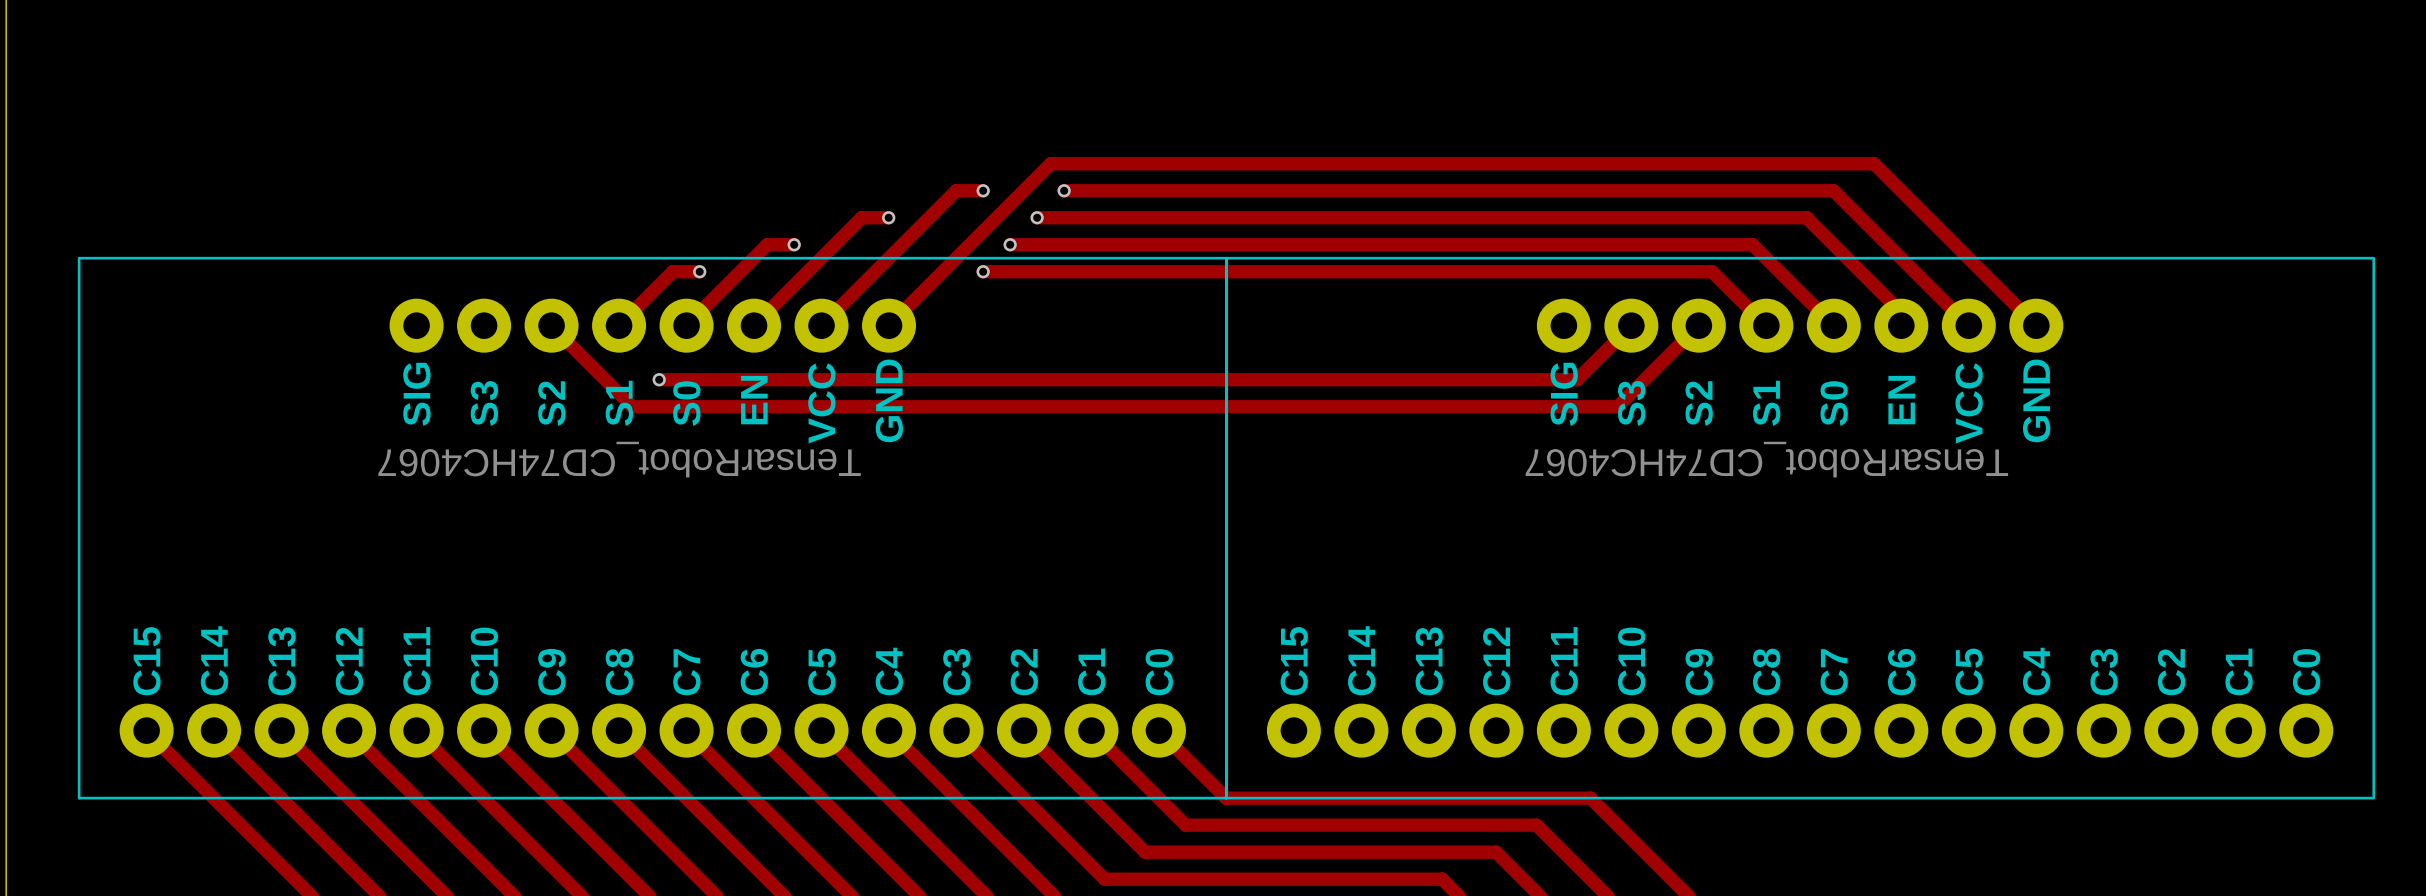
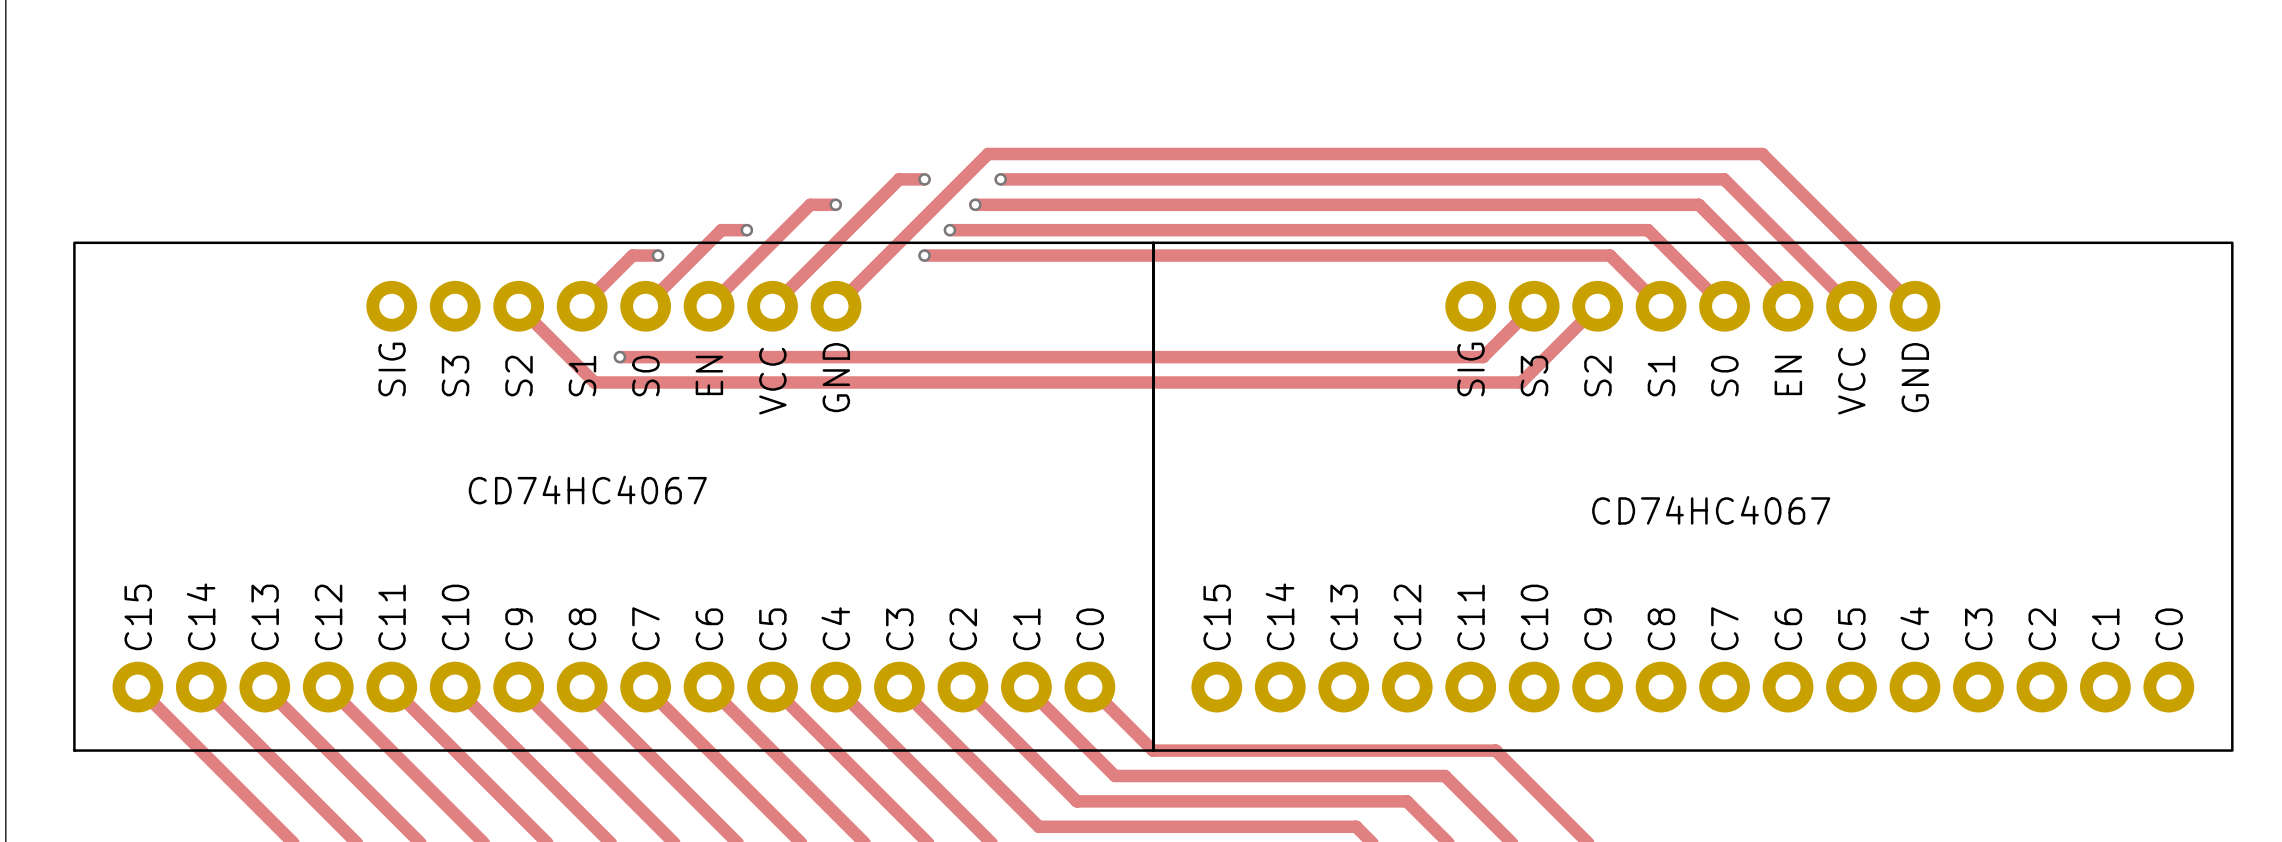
CD74HC4067 footprint: [77, 256, 1228, 800] -> [73, 241, 1155, 752]
CD74HC4067 footprint: [1225, 256, 2376, 800] -> [1152, 241, 2234, 752]
CD74HC4067 name: none -> CD74HC4067 (587, 490)
CD74HC4067 name: none -> CD74HC4067 (1711, 510)

